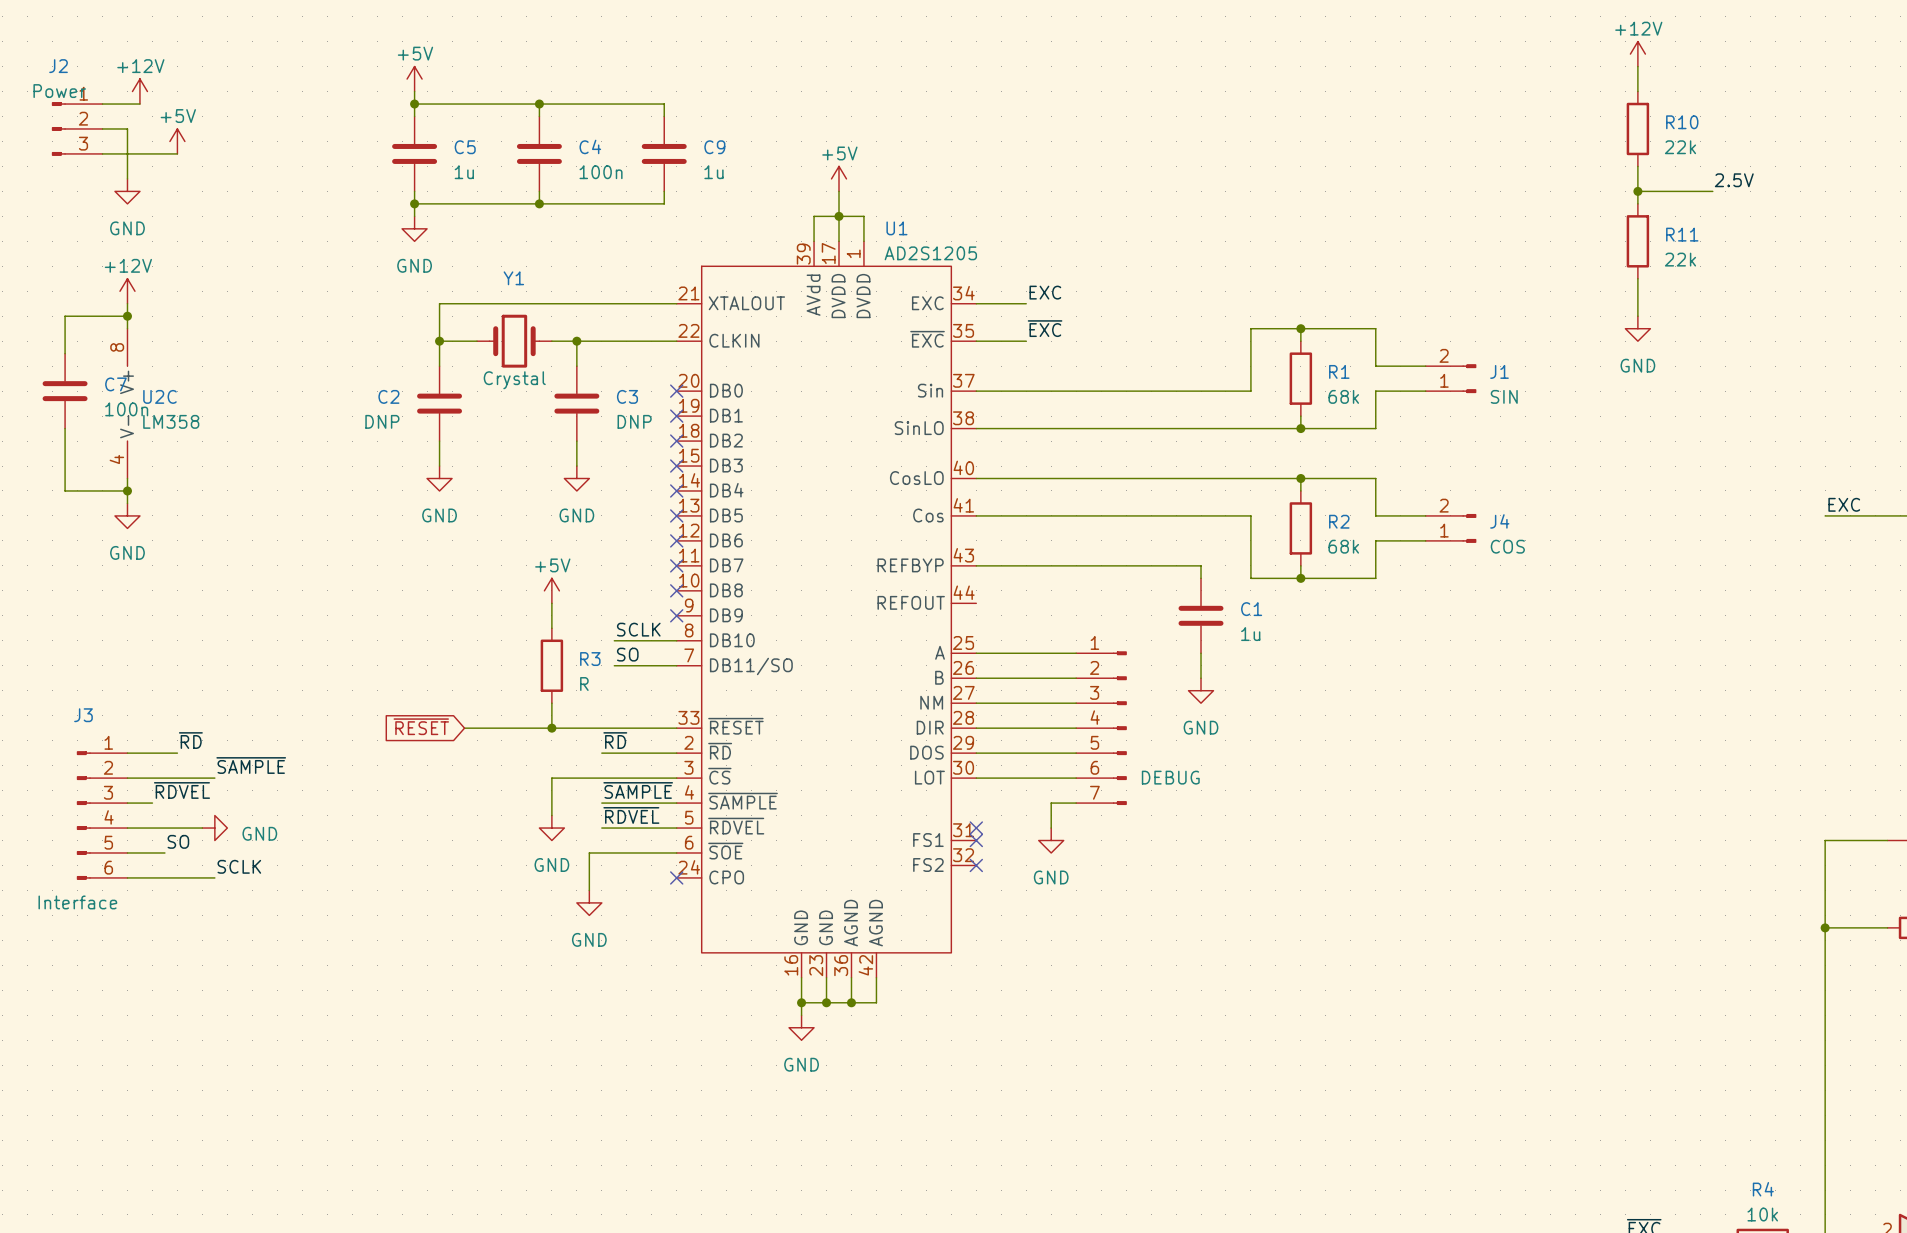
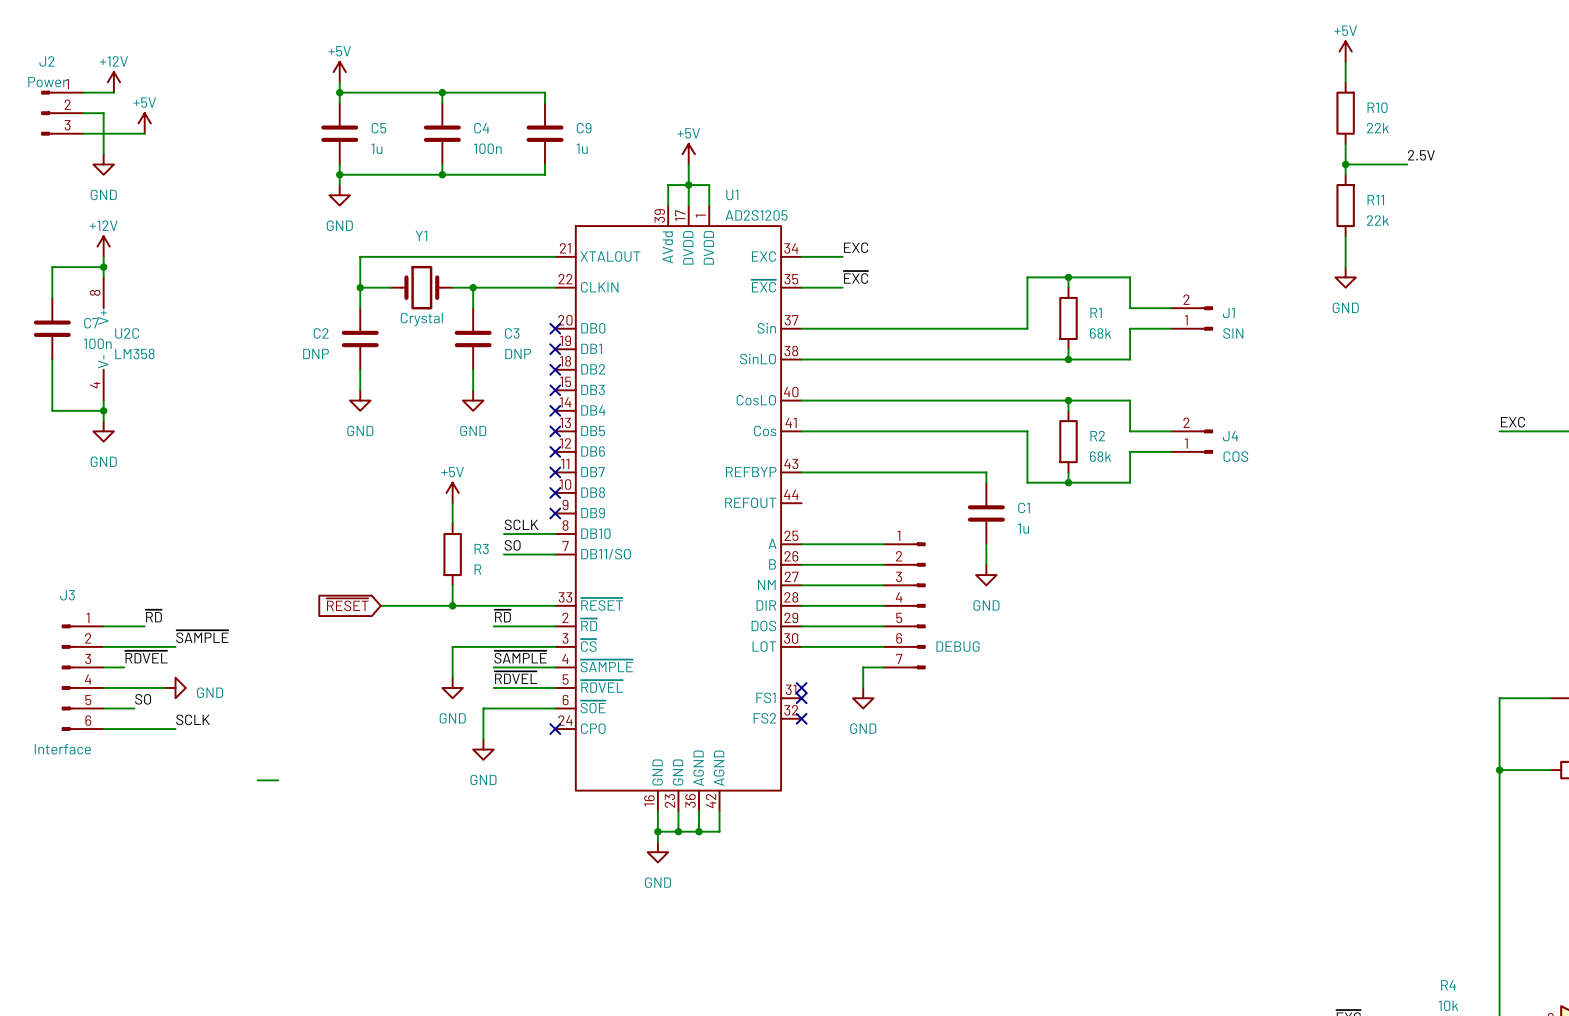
power symbol: +12V (1637, 54) -> +5V (1345, 51)
wire: none -> (257, 780) (278, 780)

